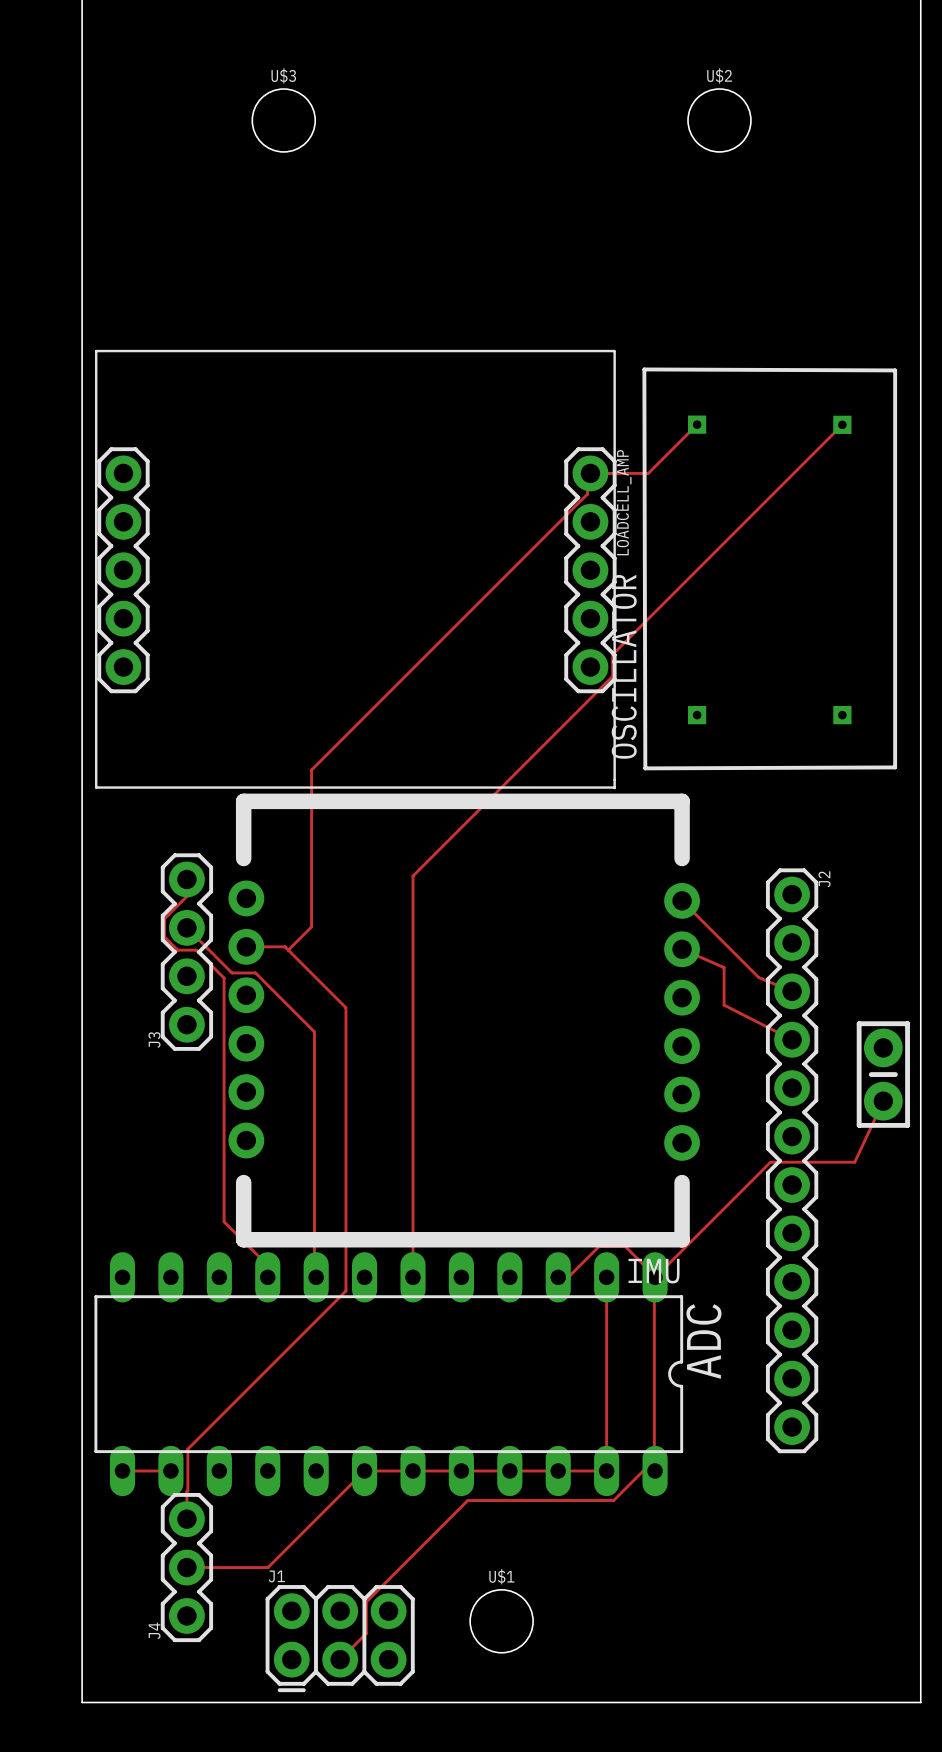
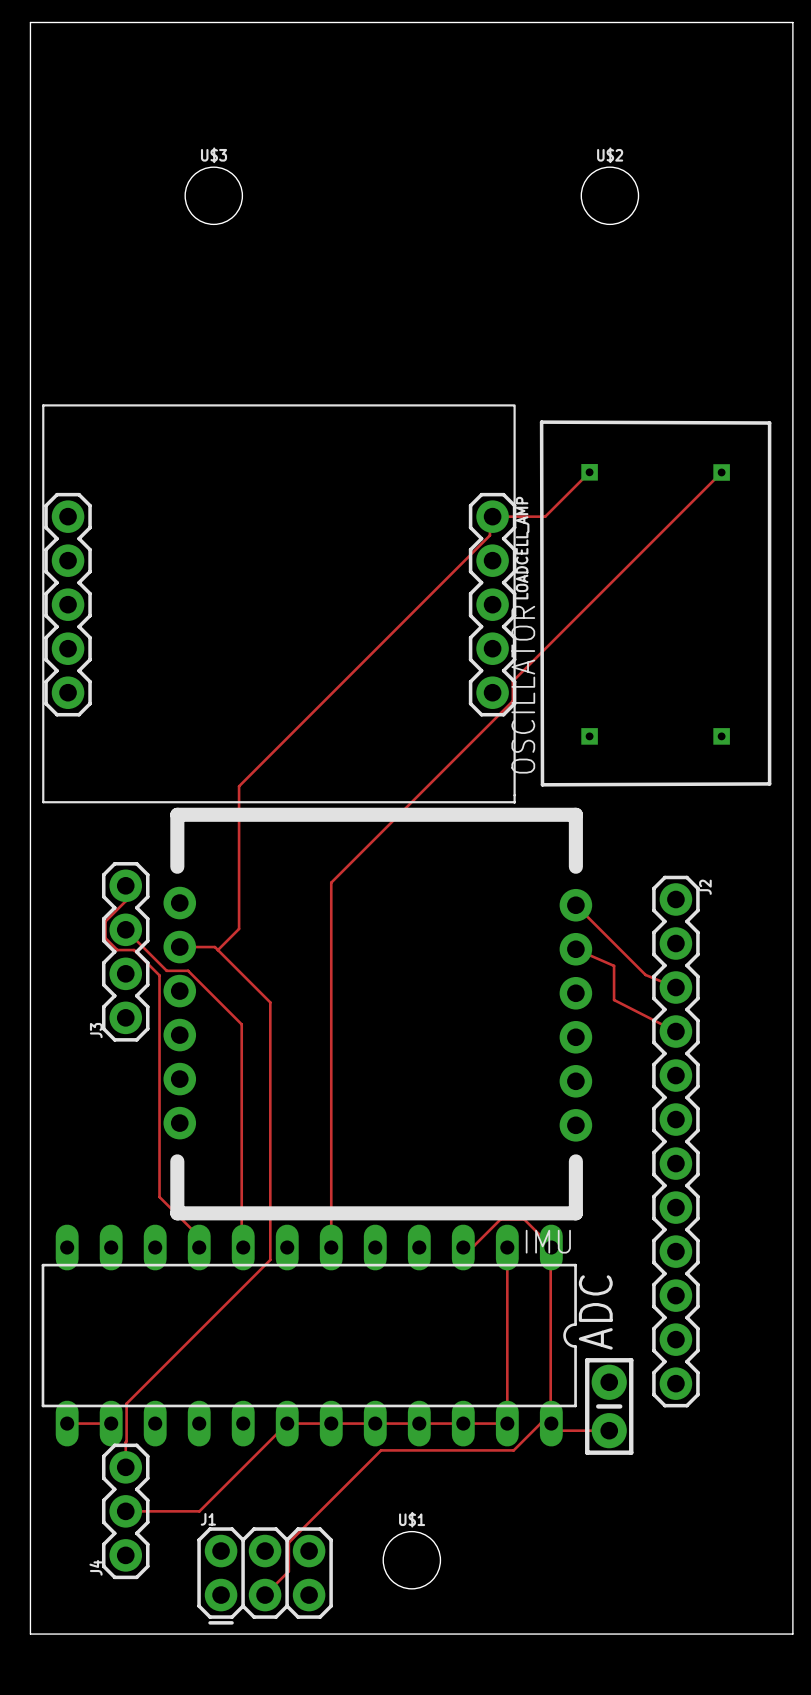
part position: (883, 1074) -> (609, 1406)
track: (883, 1101) (854, 1162) (770, 1162) (655, 1277) -> none
track: none -> (550, 1422) (558, 1430) (609, 1430)

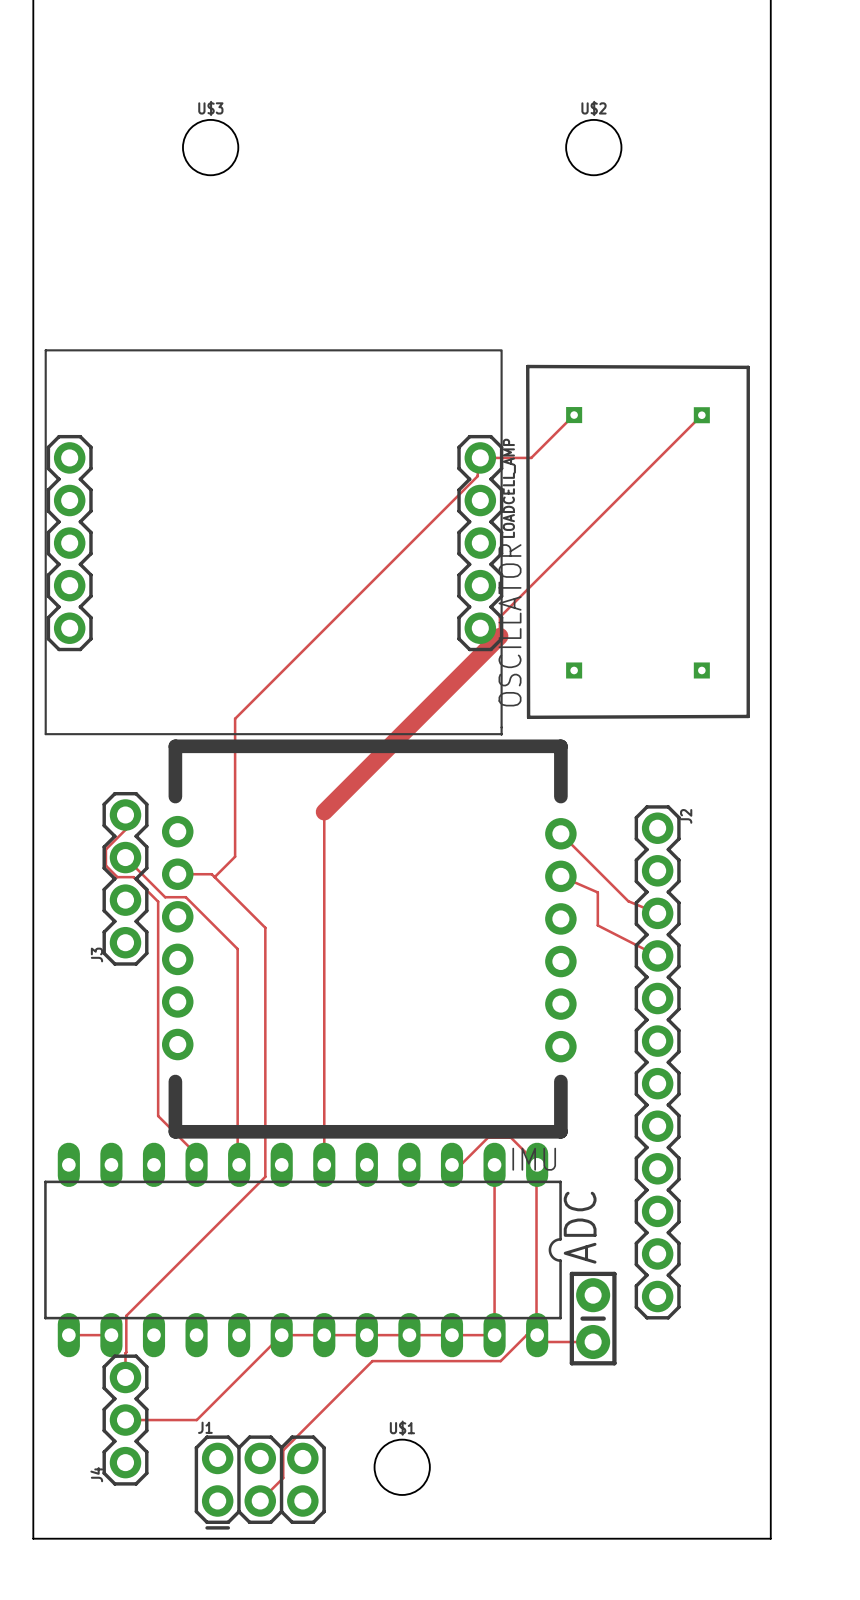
track width: thin (512, 701) (331, 882) -> thick (499, 636) (324, 811)

